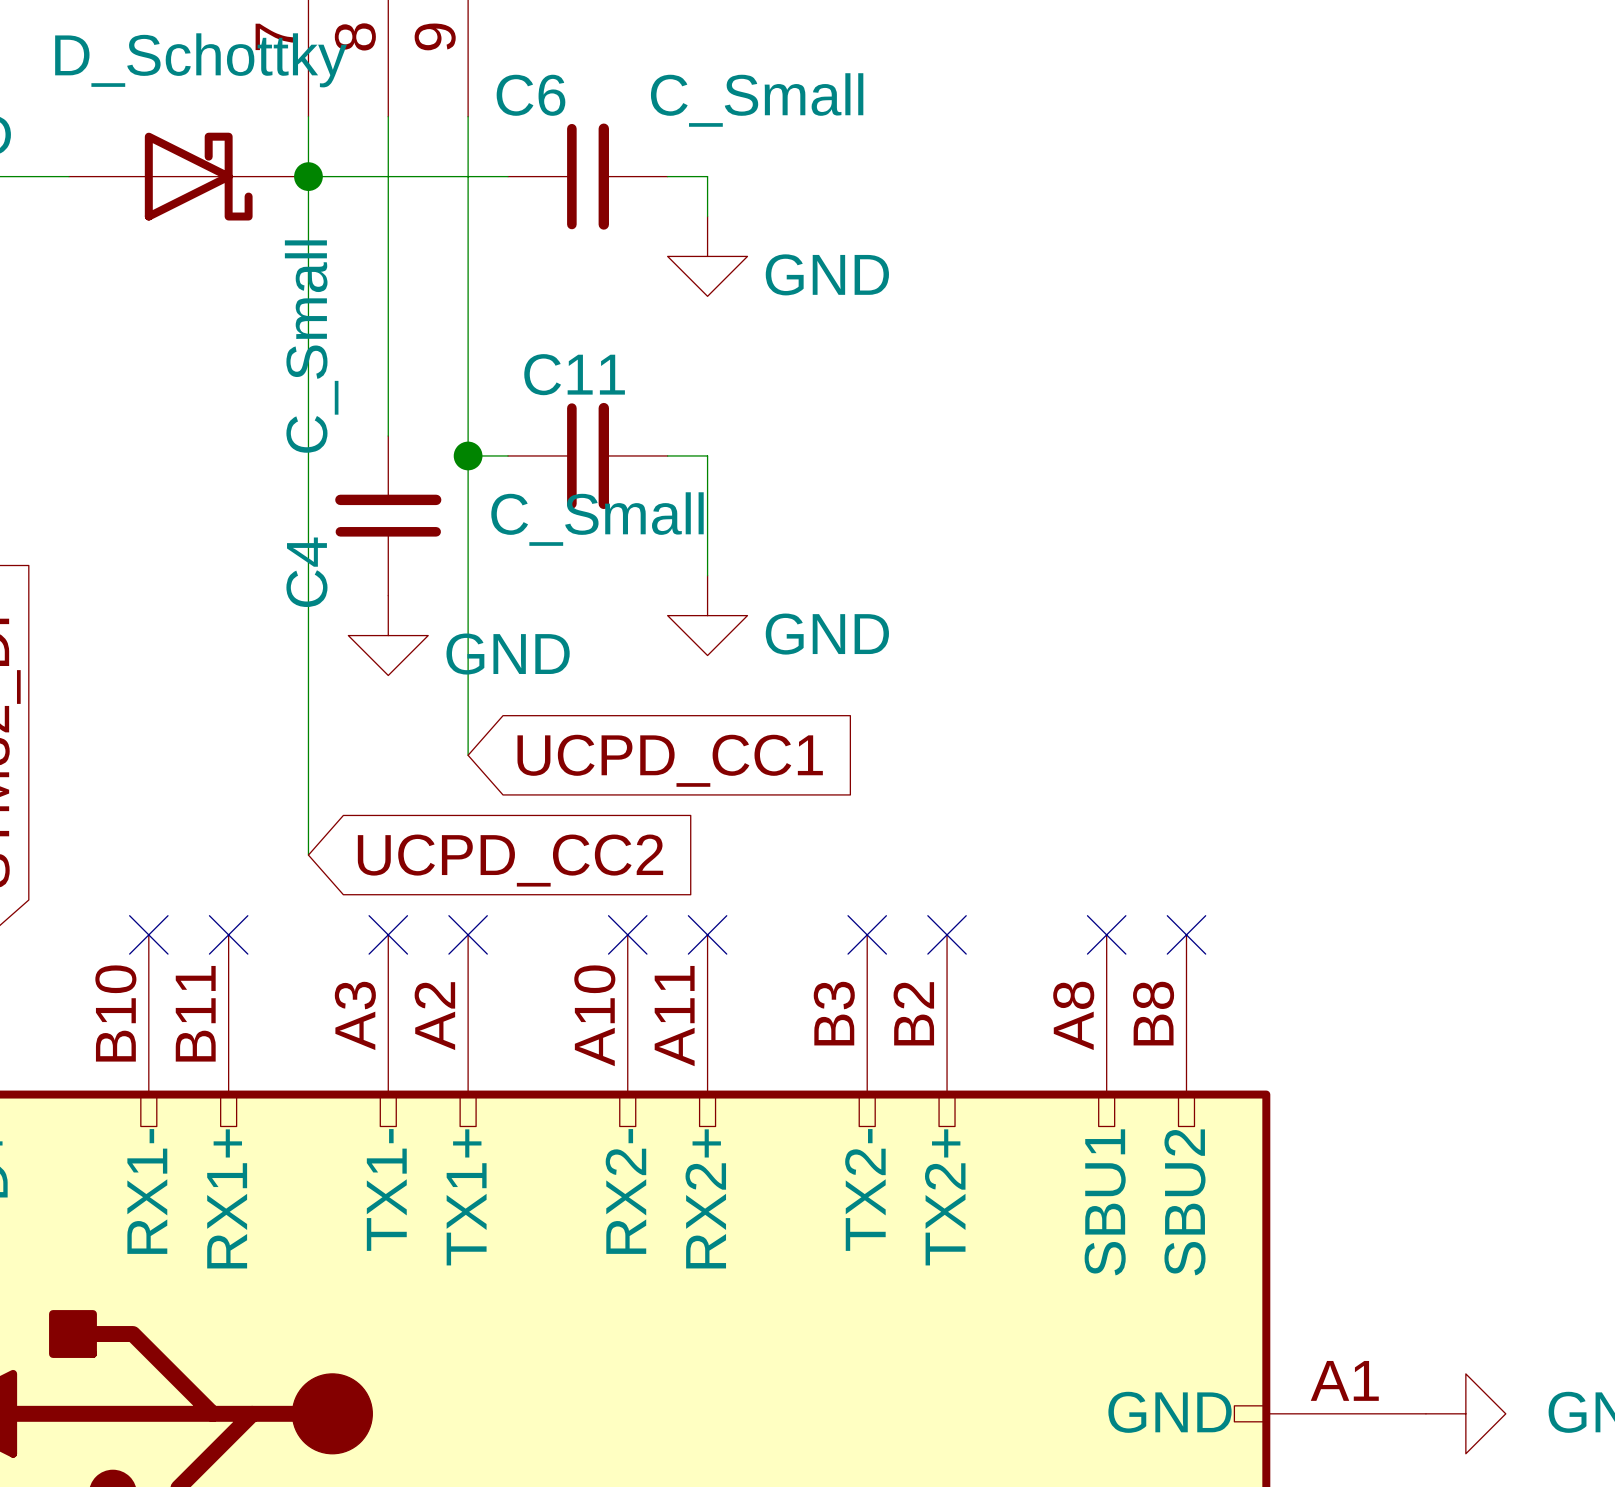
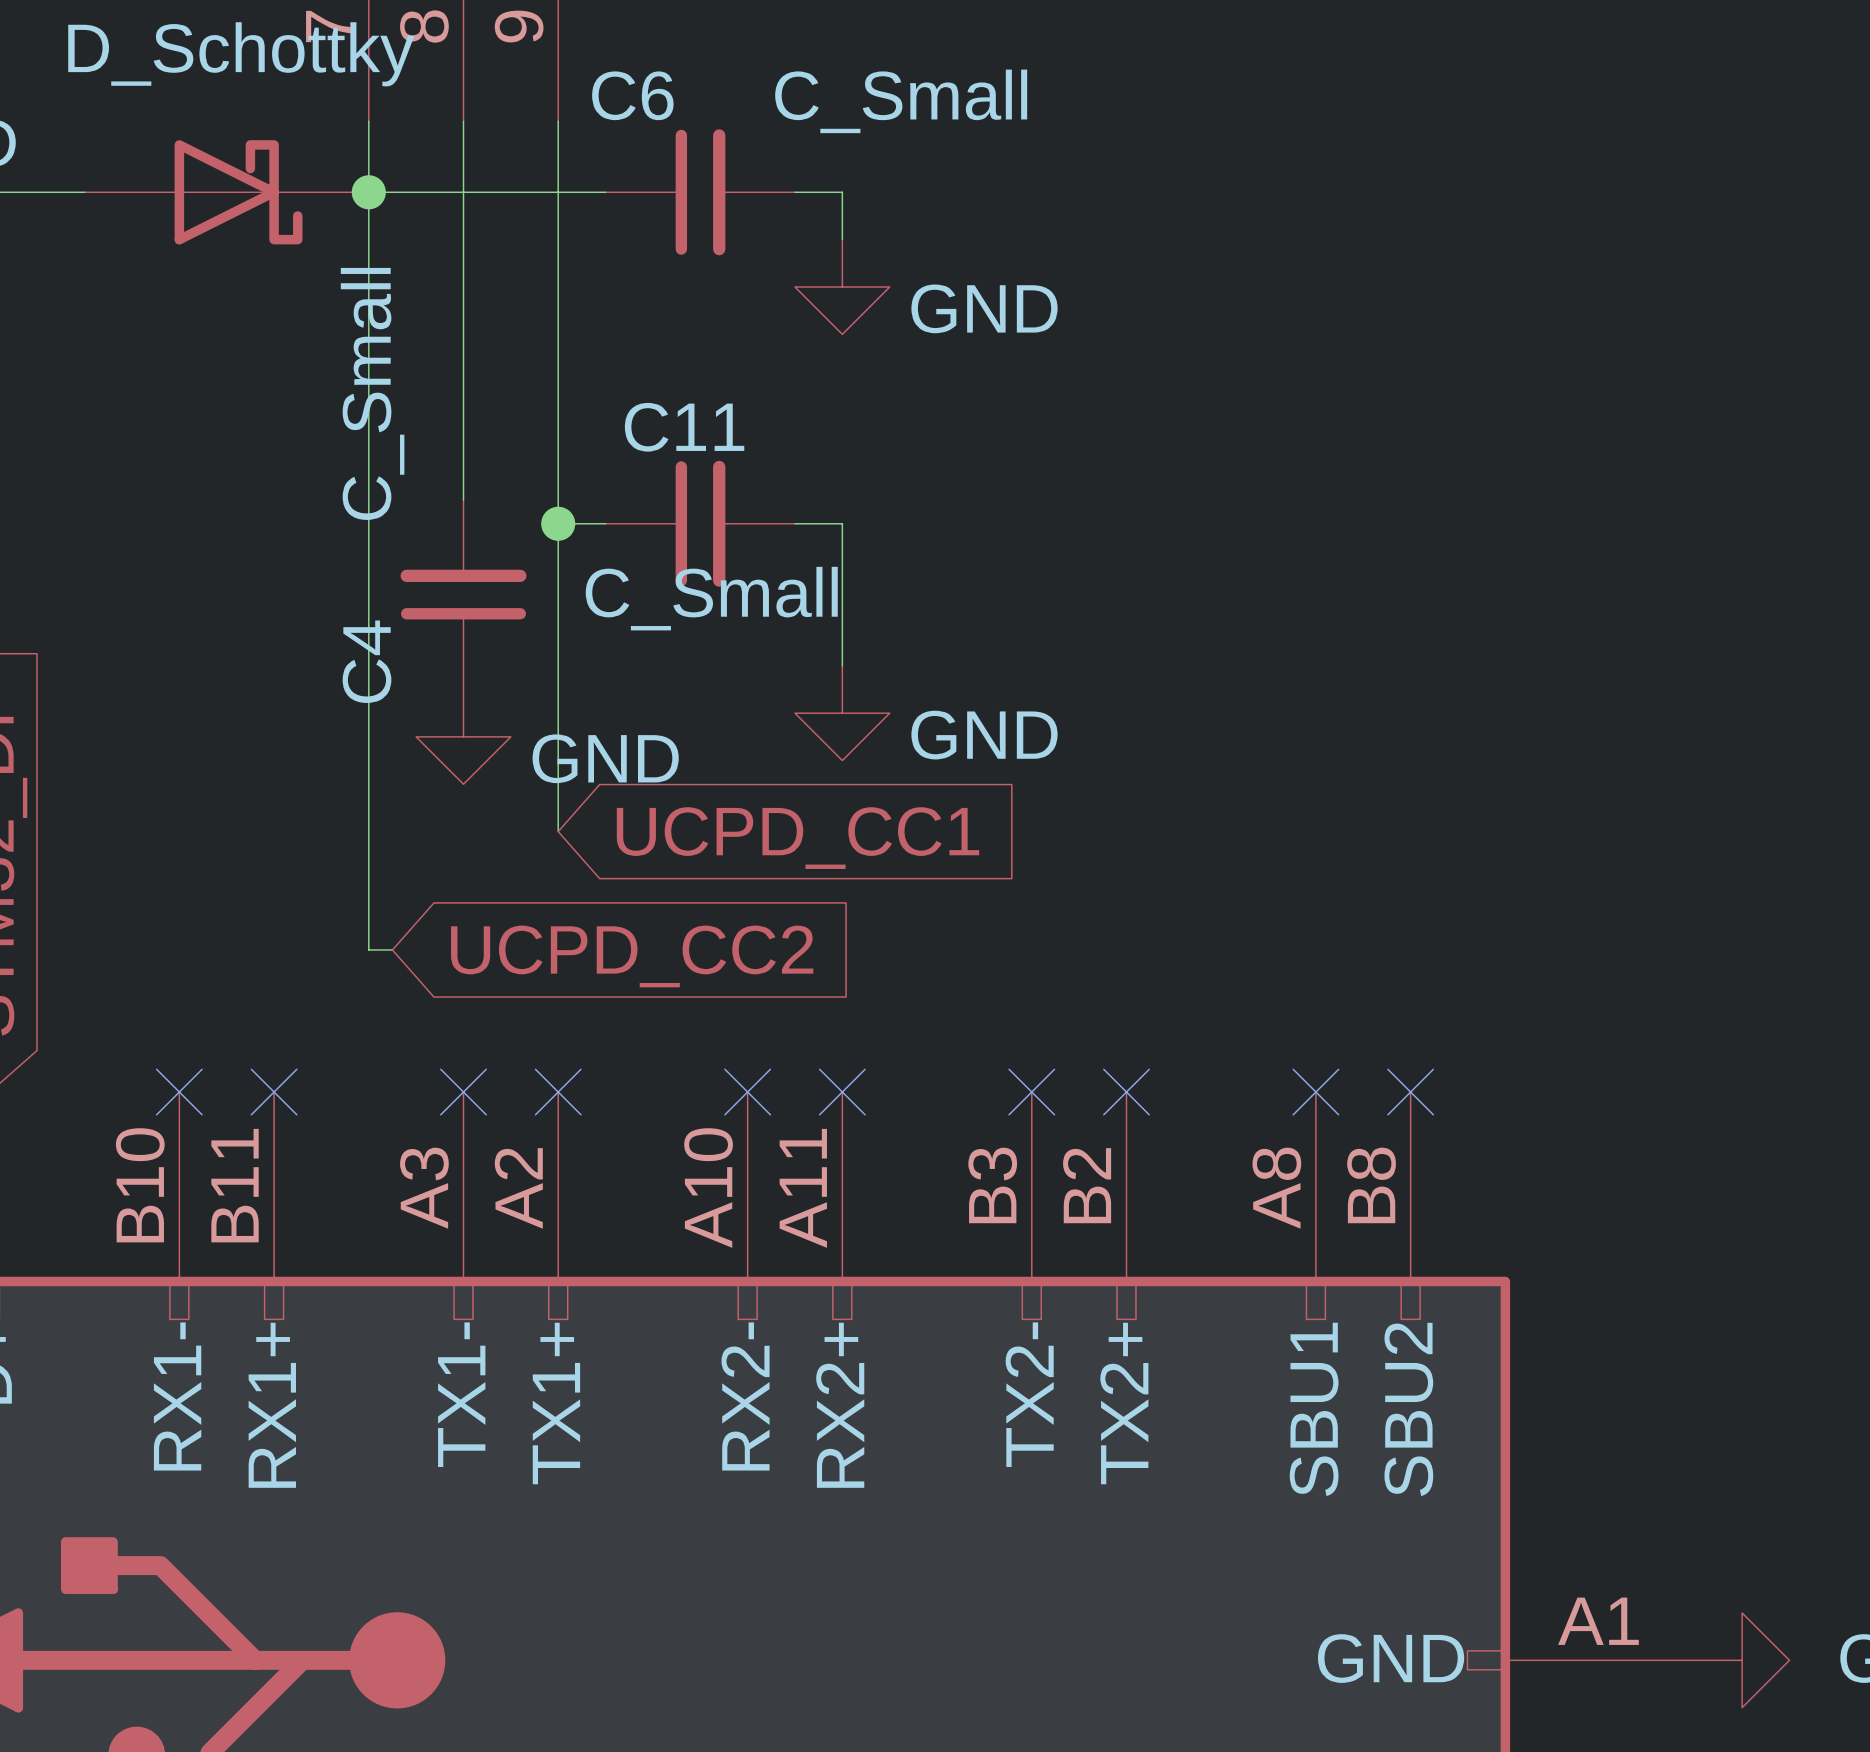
wire: (468, 715) (468, 755) -> none
global label position: UCPD_CC1 (670, 760) -> UCPD_CC1 (797, 838)
wire: (308, 815) (308, 855) -> (368, 949) (392, 949)
global label position: UCPD_CC2 (510, 860) -> UCPD_CC2 (632, 956)

